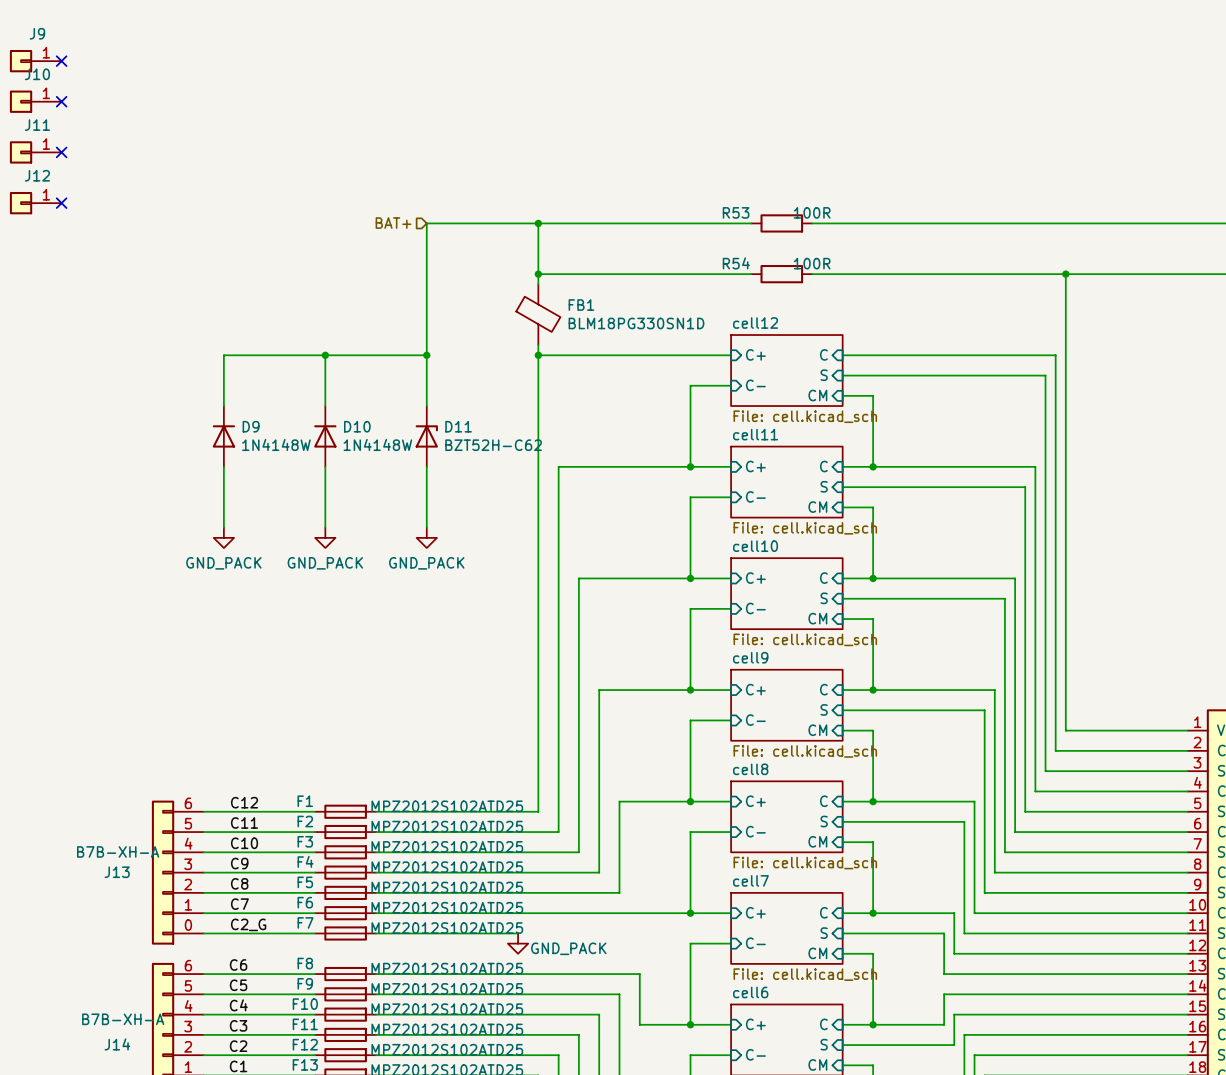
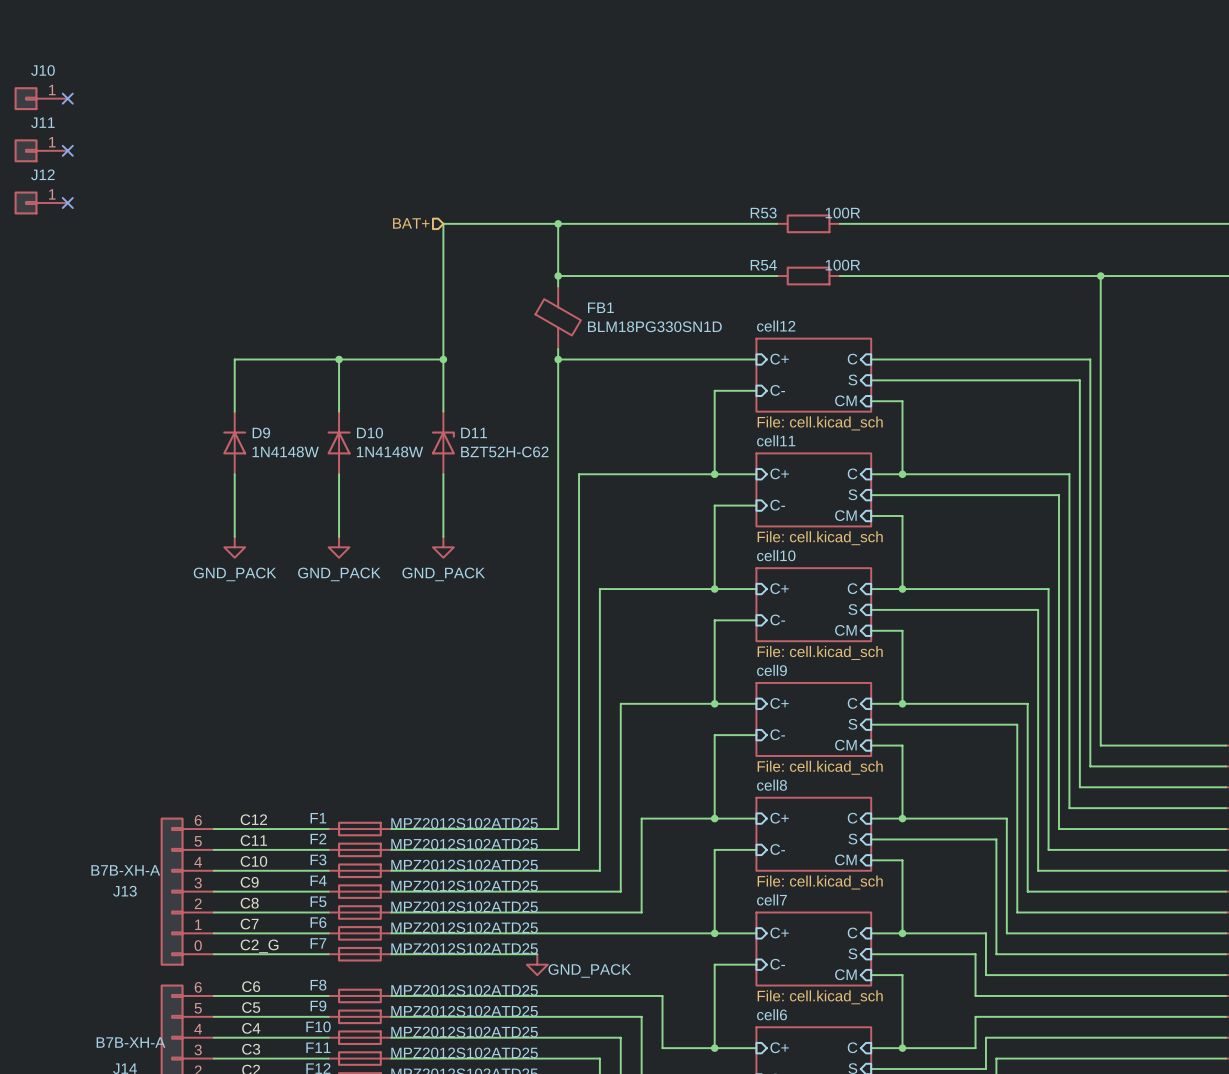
J9: (35, 61) -> none
no-connect mark: (61, 61) -> none

